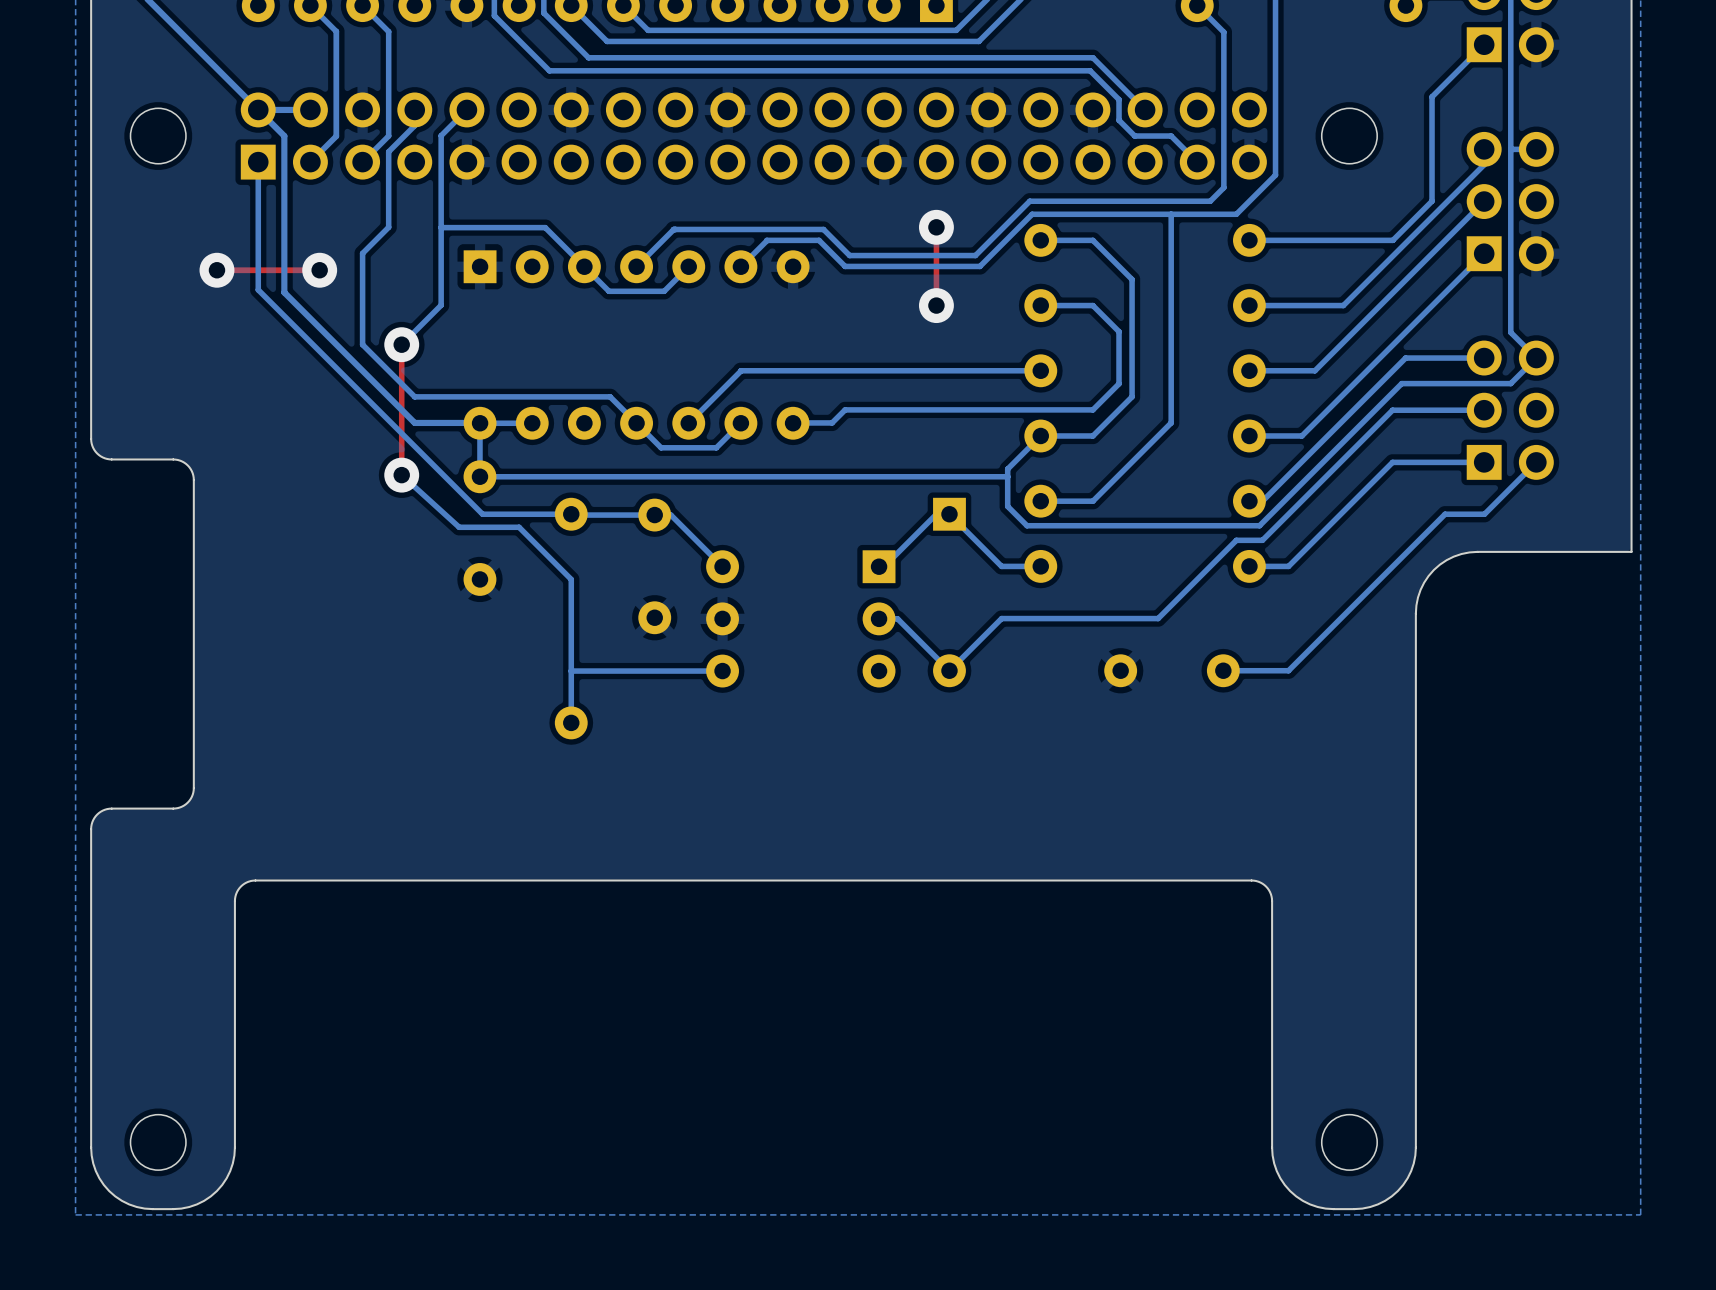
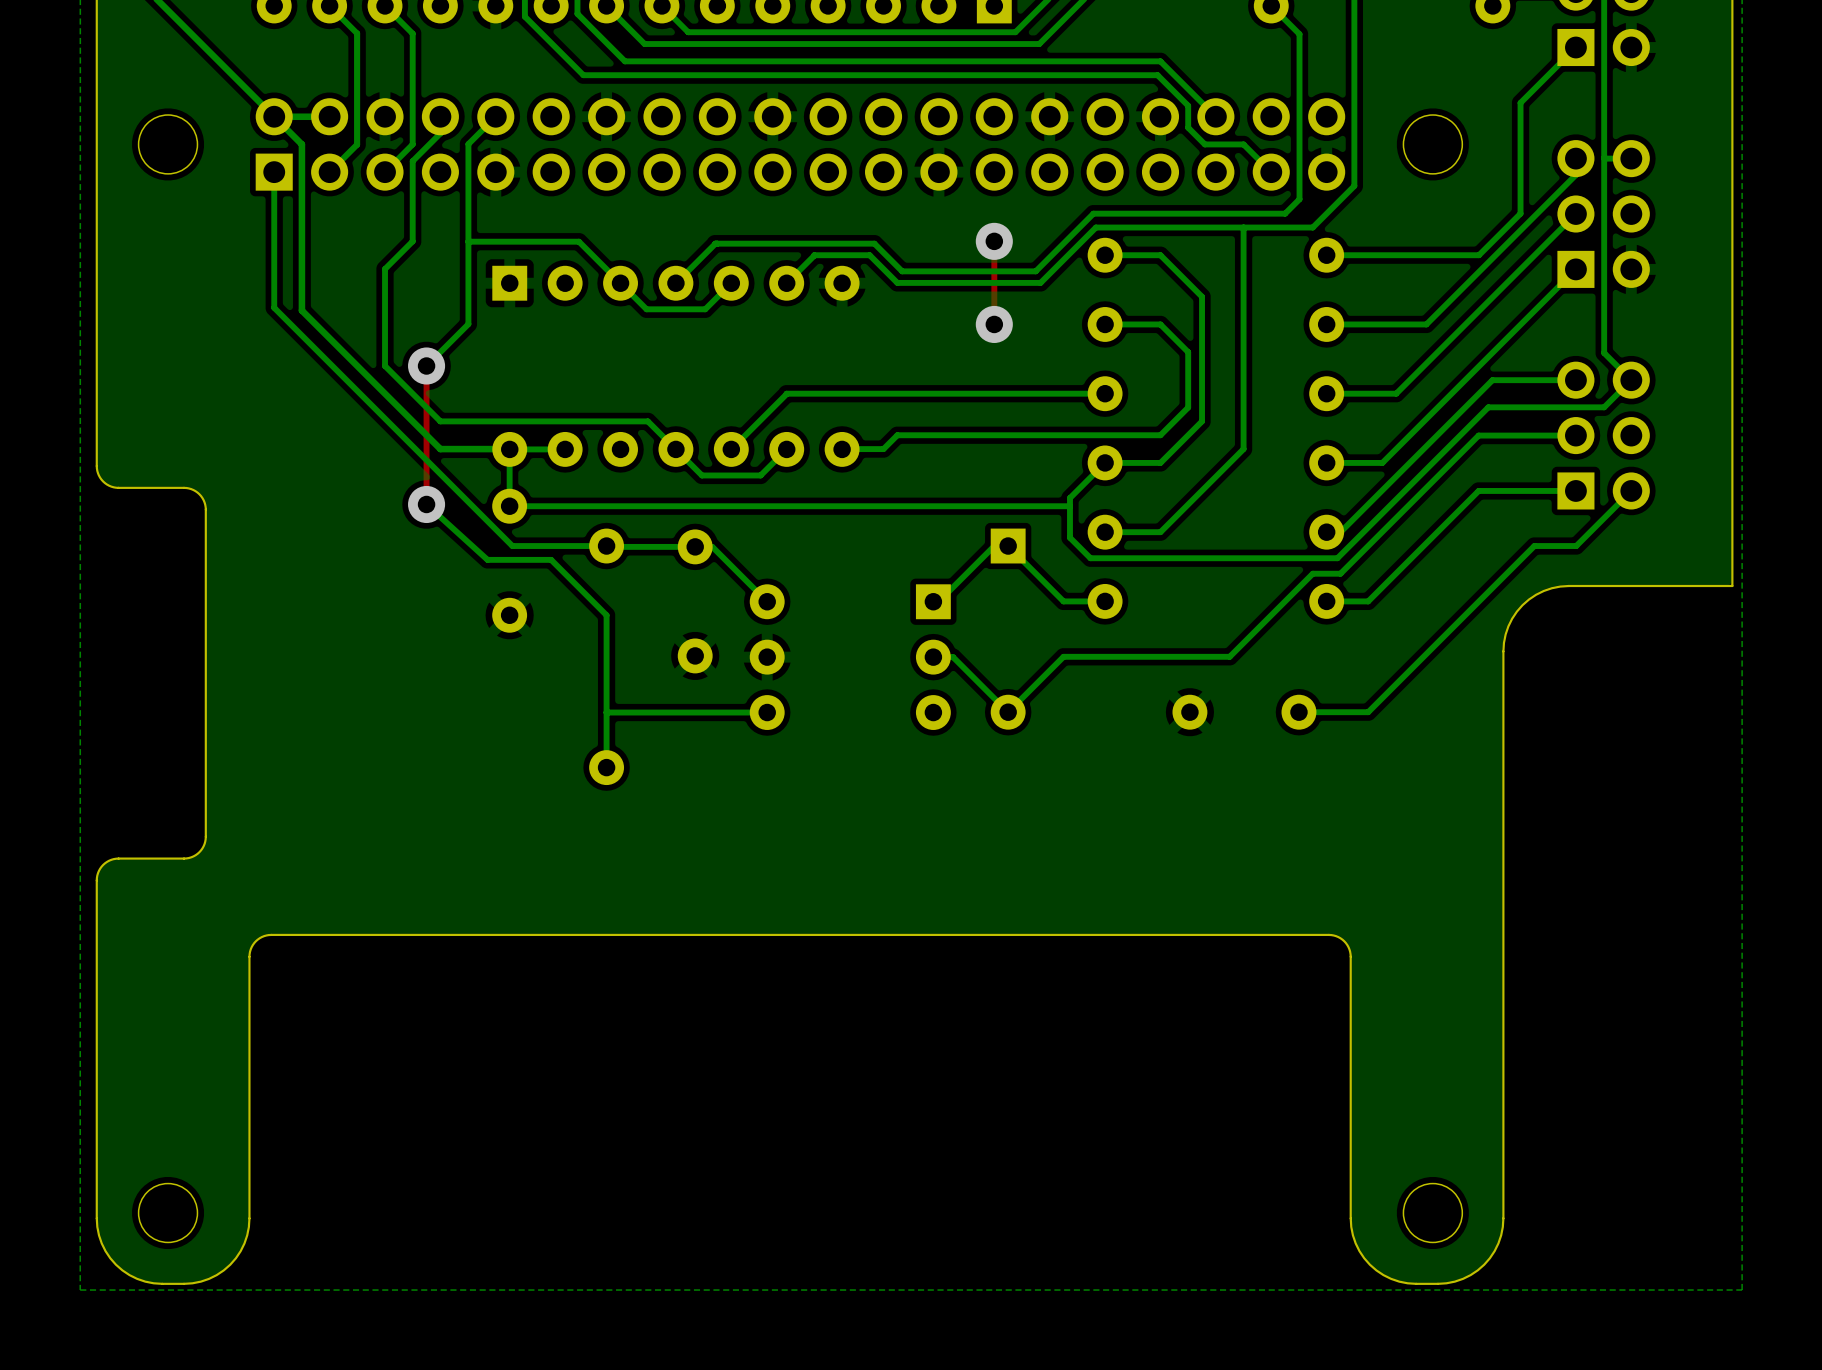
via: (216, 270) -> none
top track: (319, 270) (216, 270) -> none
via: (319, 270) -> none

